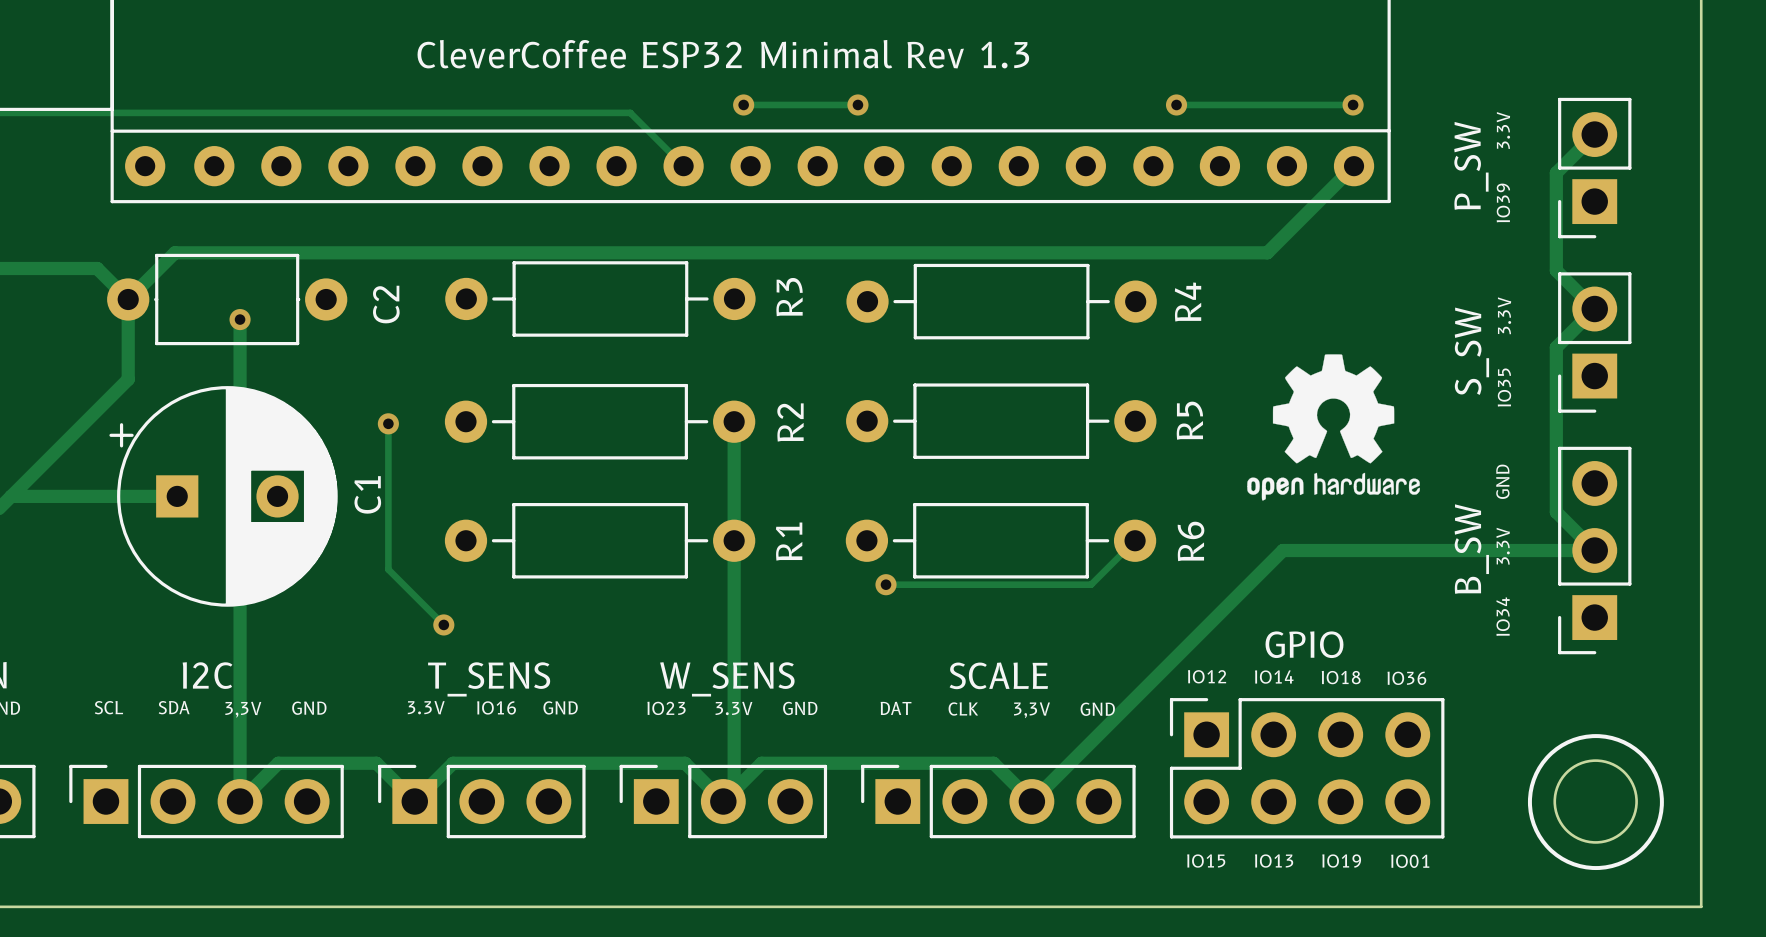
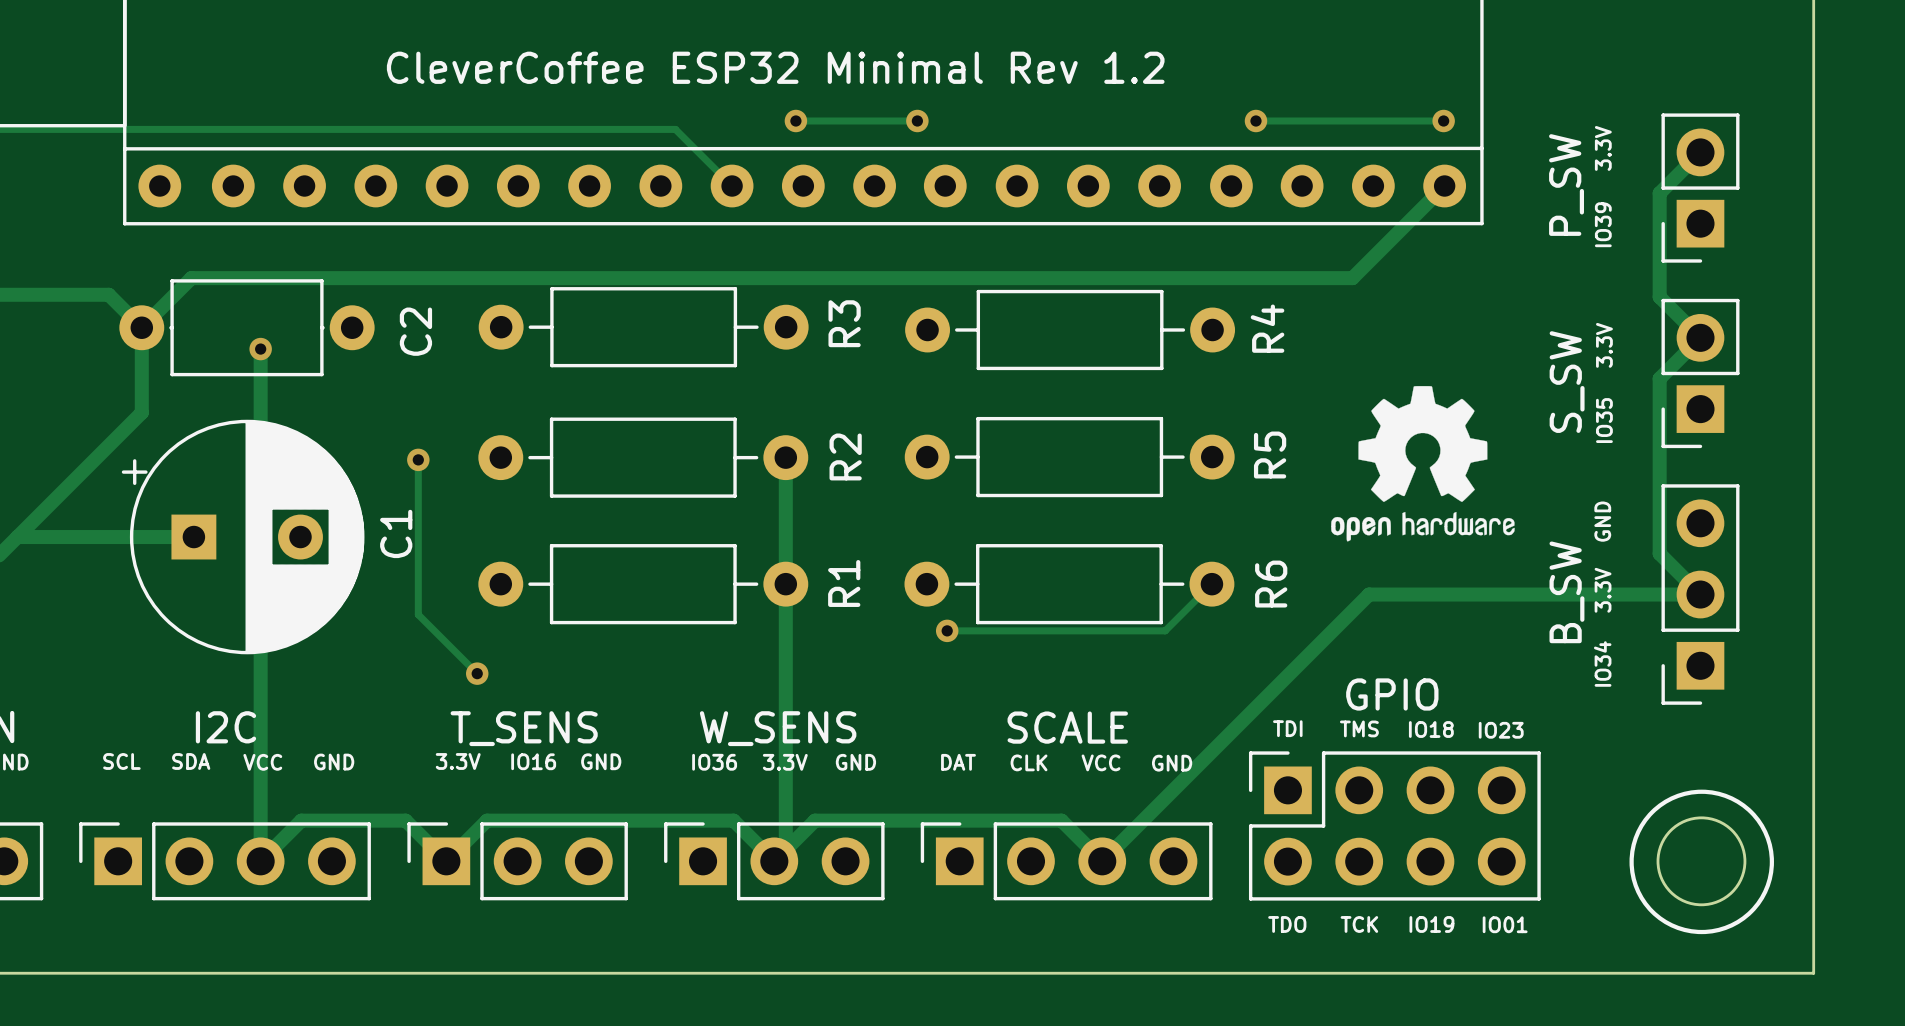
text: CleverCoffee ESP32 Minimal Rev 1.3 (723, 54) -> CleverCoffee ESP32 Minimal Rev 1.2 (775, 67)
text: IO12 (1207, 676) -> TDI (1287, 728)
text: IO14 (1274, 677) -> TMS (1359, 728)
text: IO36 (1406, 678) -> IO23 (1501, 730)
text: IO23 (666, 708) -> IO36 (714, 762)
text: 3,3V (243, 709) -> VCC (262, 762)
text: 3,3V (1031, 710) -> VCC (1101, 762)
text: IO15 (1206, 861) -> TDO (1287, 924)
text: IO13 (1274, 861) -> TCK (1359, 924)

